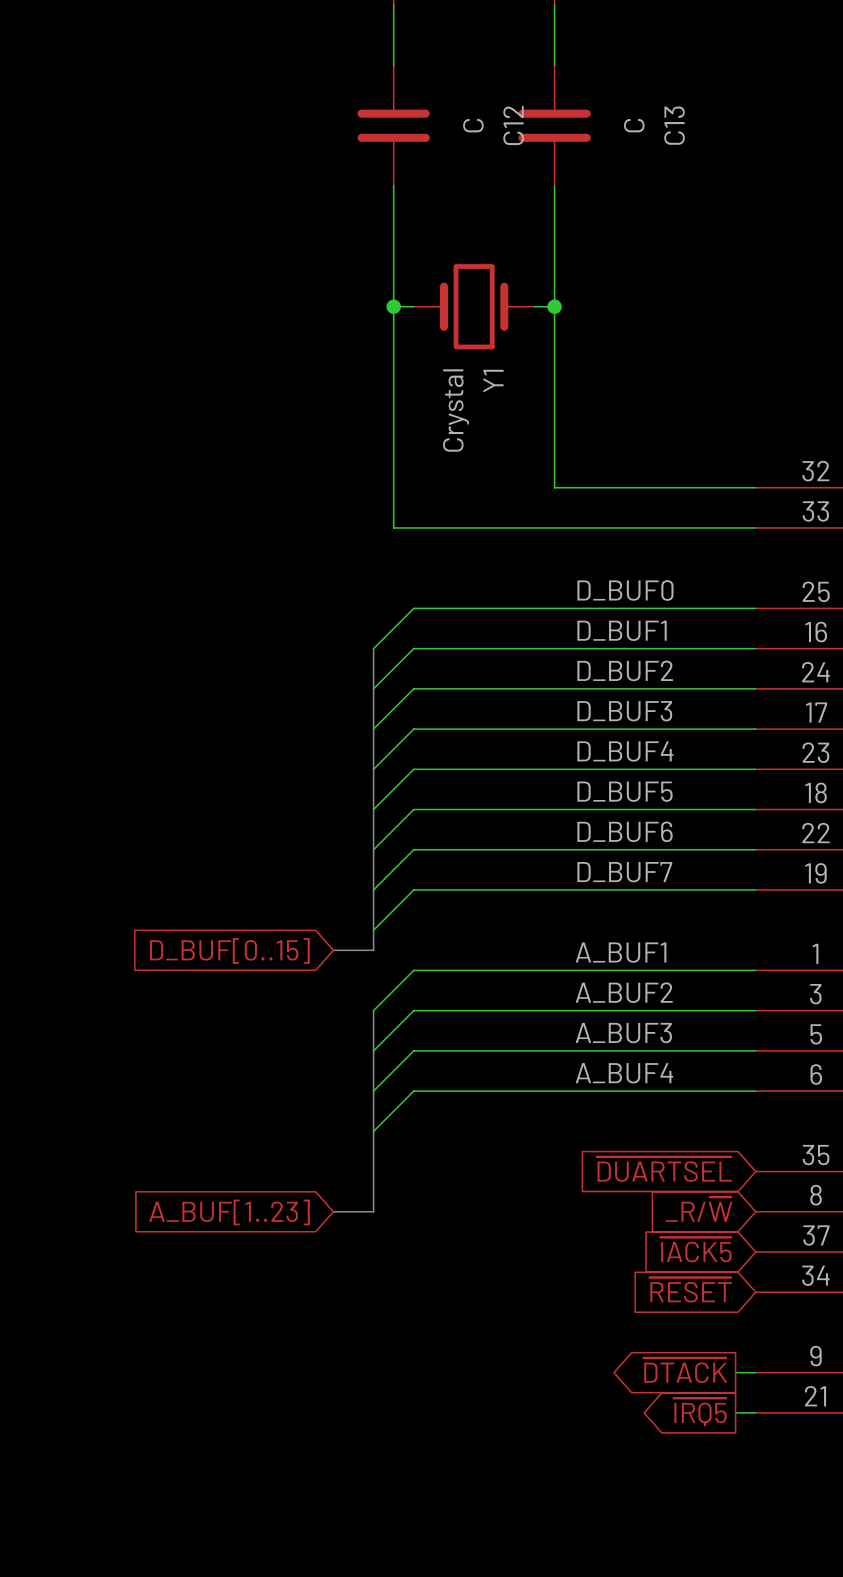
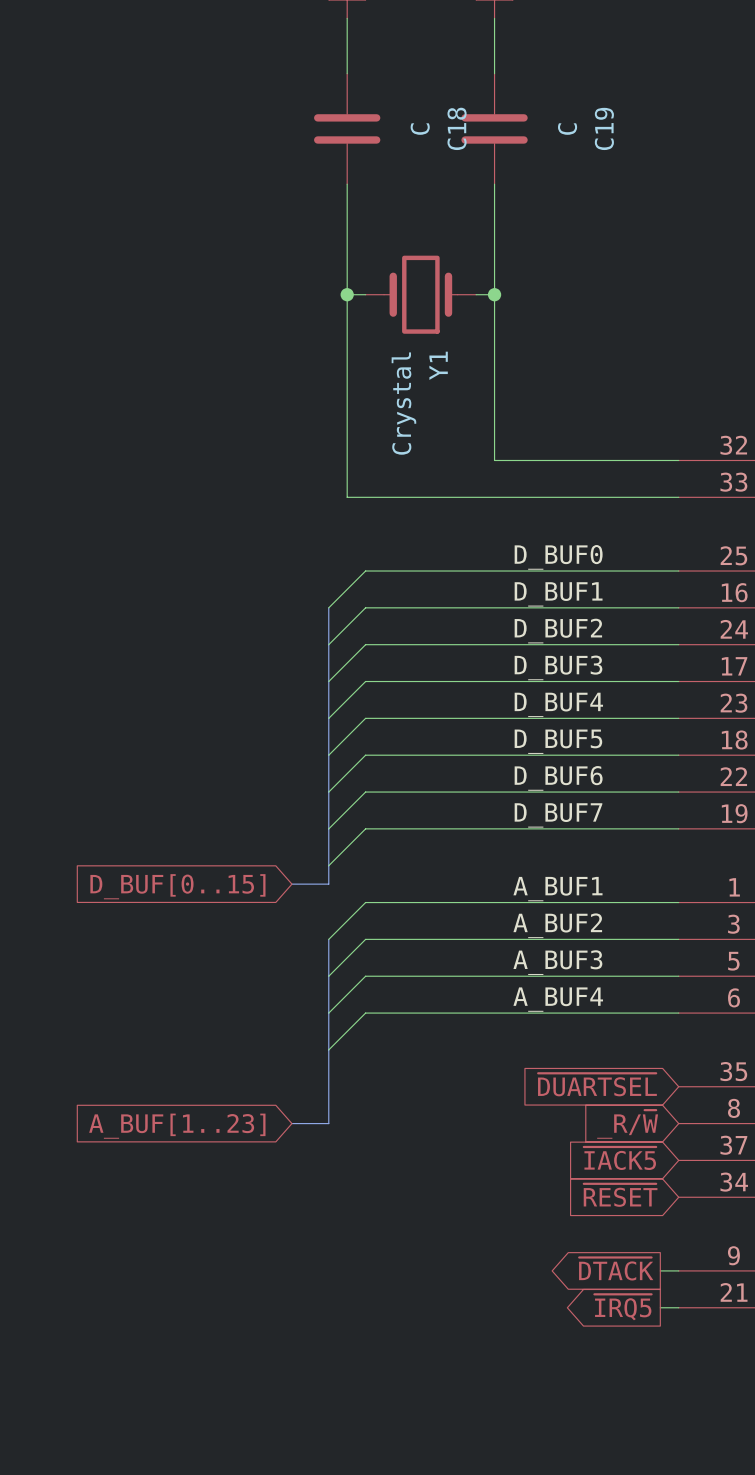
C12 name: C12 (513, 125) -> C18 (457, 128)
C13 name: C13 (674, 125) -> C19 (604, 128)

